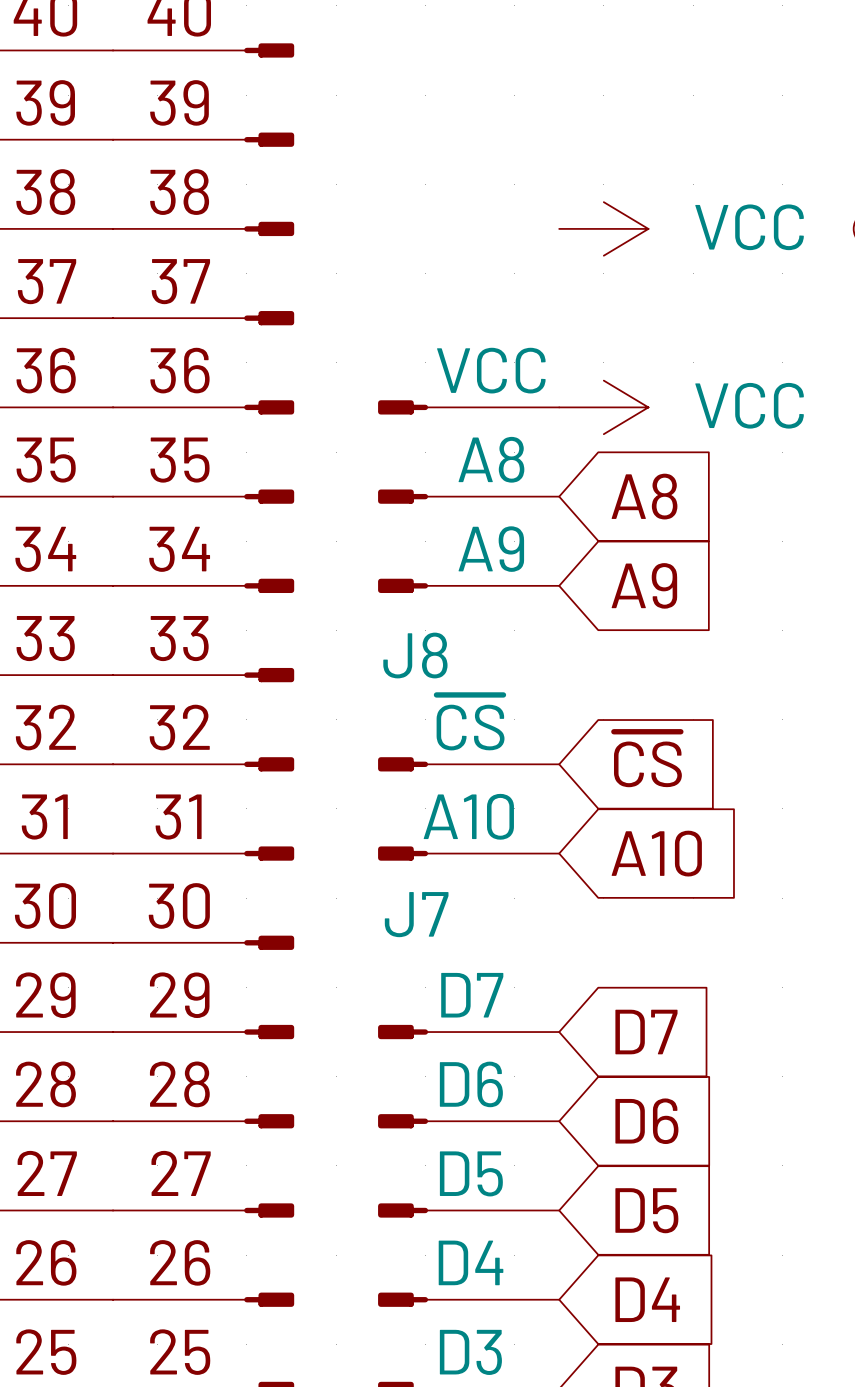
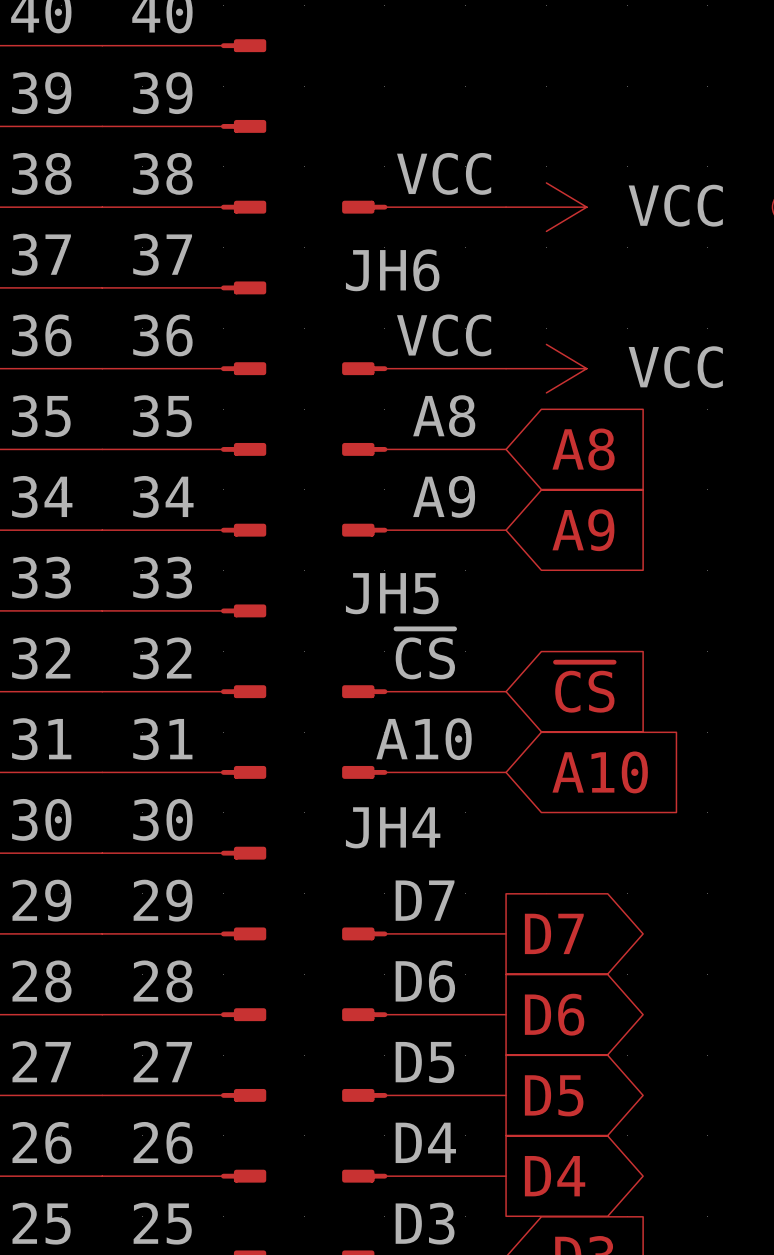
JH6: none -> (424, 207)
J8 name: J8 (415, 655) -> JH5 (392, 593)
J7 name: J7 (416, 914) -> JH4 (393, 827)
global label shape: input (646, 1032) -> output (554, 933)
global label shape: input (646, 1121) -> output (554, 1014)
global label shape: input (646, 1210) -> output (554, 1095)
global label shape: input (647, 1299) -> output (555, 1176)

